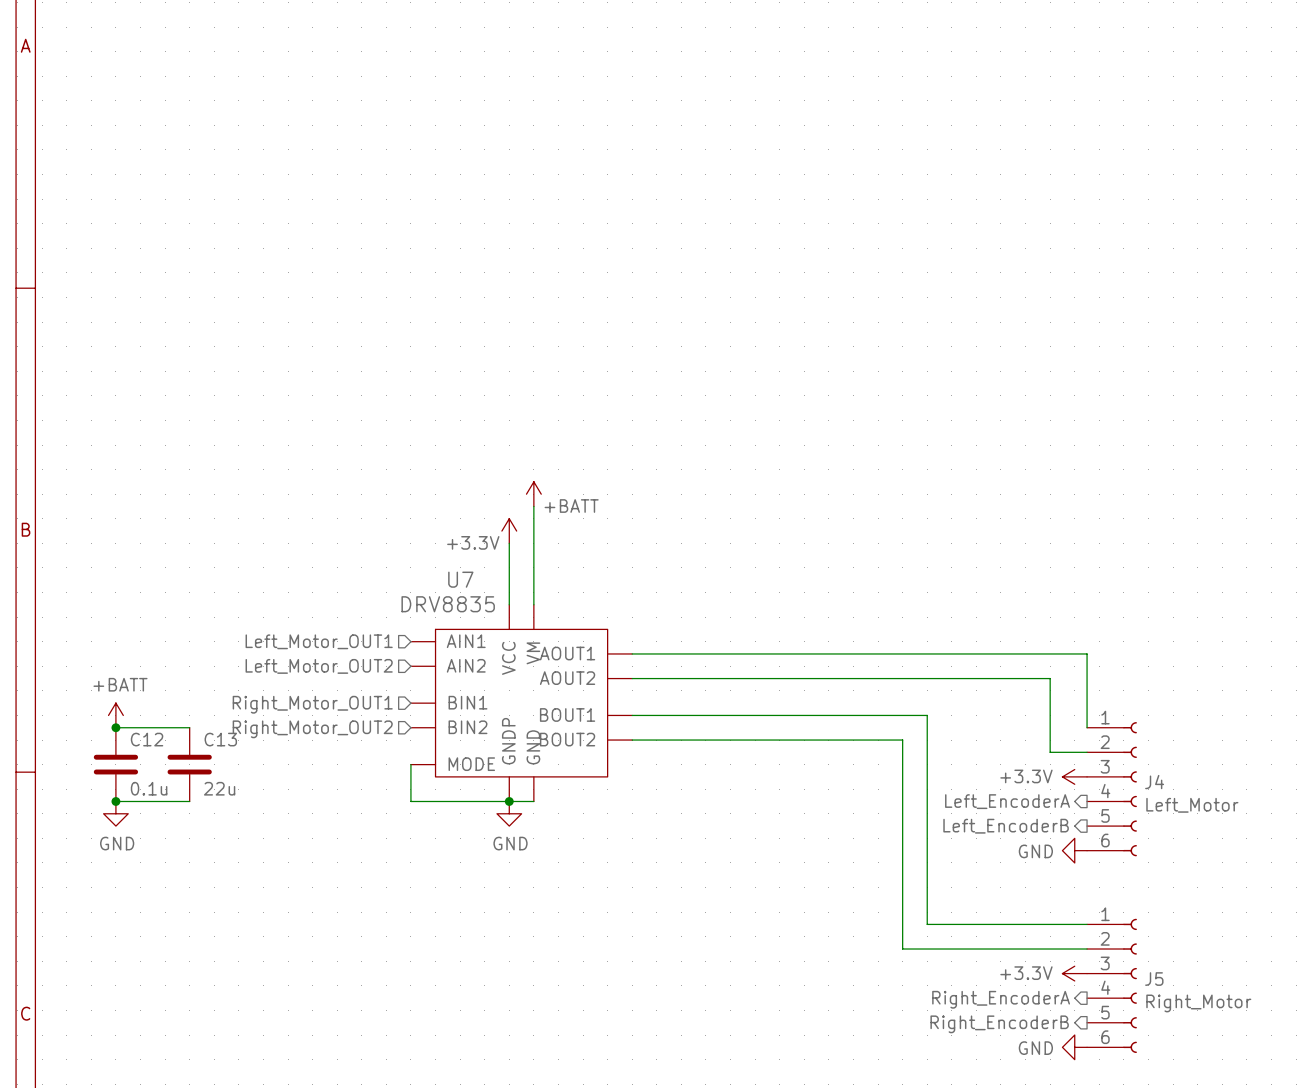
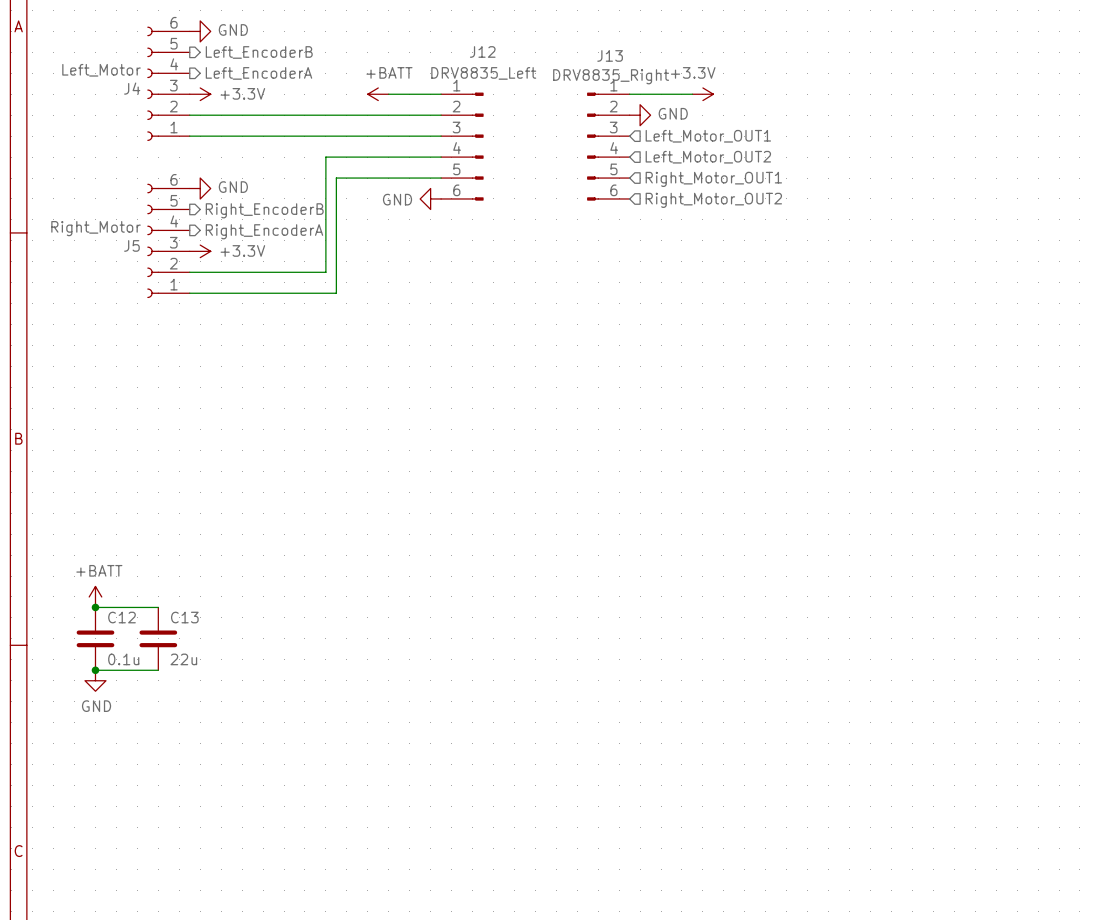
power symbol: none -> GND (200, 31)
hierarchical label: none -> Left_EncoderB (259, 52)
hierarchical label: none -> Left_EncoderA (258, 73)
power symbol: none -> +3.3V (200, 94)
power symbol: none -> +BATT (378, 94)
wire: none -> (388, 94) (441, 94)
wire: none -> (629, 94) (692, 94)
power symbol: none -> +3.3V (702, 94)
wire: none -> (189, 115) (441, 115)
power symbol: none -> GND (640, 115)
wire: none -> (189, 136) (441, 136)
hierarchical label: none -> Left_Motor_OUT1 (708, 136)
J12: none -> DRV8835_Left (462, 146)
J13: none -> DRV8835_Right (608, 146)
wire: none -> (441, 157) (325, 157) (325, 272) (189, 272)
hierarchical label: none -> Left_Motor_OUT2 (708, 157)
wire: none -> (441, 178) (336, 178) (336, 293) (189, 293)
hierarchical label: none -> Right_Motor_OUT1 (713, 179)
power symbol: none -> GND (200, 188)
power symbol: none -> GND (430, 198)
hierarchical label: none -> Right_Motor_OUT2 (713, 200)
hierarchical label: none -> Right_EncoderB (264, 210)
hierarchical label: none -> Right_EncoderA (264, 231)
power symbol: none -> +3.3V (200, 251)
power symbol: +BATT (533, 494) -> none
wire: (533, 506) (533, 604) -> none
power symbol: +3.3V (509, 531) -> none
wire: (509, 543) (509, 604) -> none
hierarchical label: Left_Motor_OUT1 (319, 641) -> none
wire: (632, 653) (1087, 653) (1087, 727) -> none
hierarchical label: Left_Motor_OUT2 (319, 666) -> none
wire: (632, 678) (1050, 678) (1050, 752) (1087, 752) -> none
U7: DRV8835 (521, 703) -> none
hierarchical label: Right_Motor_OUT1 (312, 704) -> none
wire: (632, 715) (927, 715) (927, 924) (1087, 924) -> none
hierarchical label: Right_Motor_OUT2 (312, 729) -> none
wire: (632, 740) (902, 740) (902, 949) (1087, 949) -> none
wire: (410, 764) (410, 801) (533, 801) -> none
power symbol: +3.3V (1074, 776) -> none
J4 position: (1111, 789) -> (168, 83)
J4 rotation: 0° (1130, 789) -> 180° (153, 83)
junction: (509, 801) -> none
hierarchical label: Left_EncoderA (1007, 801) -> none
power symbol: GND (509, 813) -> none
hierarchical label: Left_EncoderB (1006, 826) -> none
power symbol: GND (1074, 850) -> none
power symbol: +3.3V (1074, 973) -> none
J5 position: (1111, 985) -> (168, 240)
J5 rotation: 0° (1130, 985) -> 180° (153, 240)
hierarchical label: Right_EncoderA (1001, 999) -> none
hierarchical label: Right_EncoderB (999, 1024) -> none
power symbol: GND (1074, 1047) -> none

